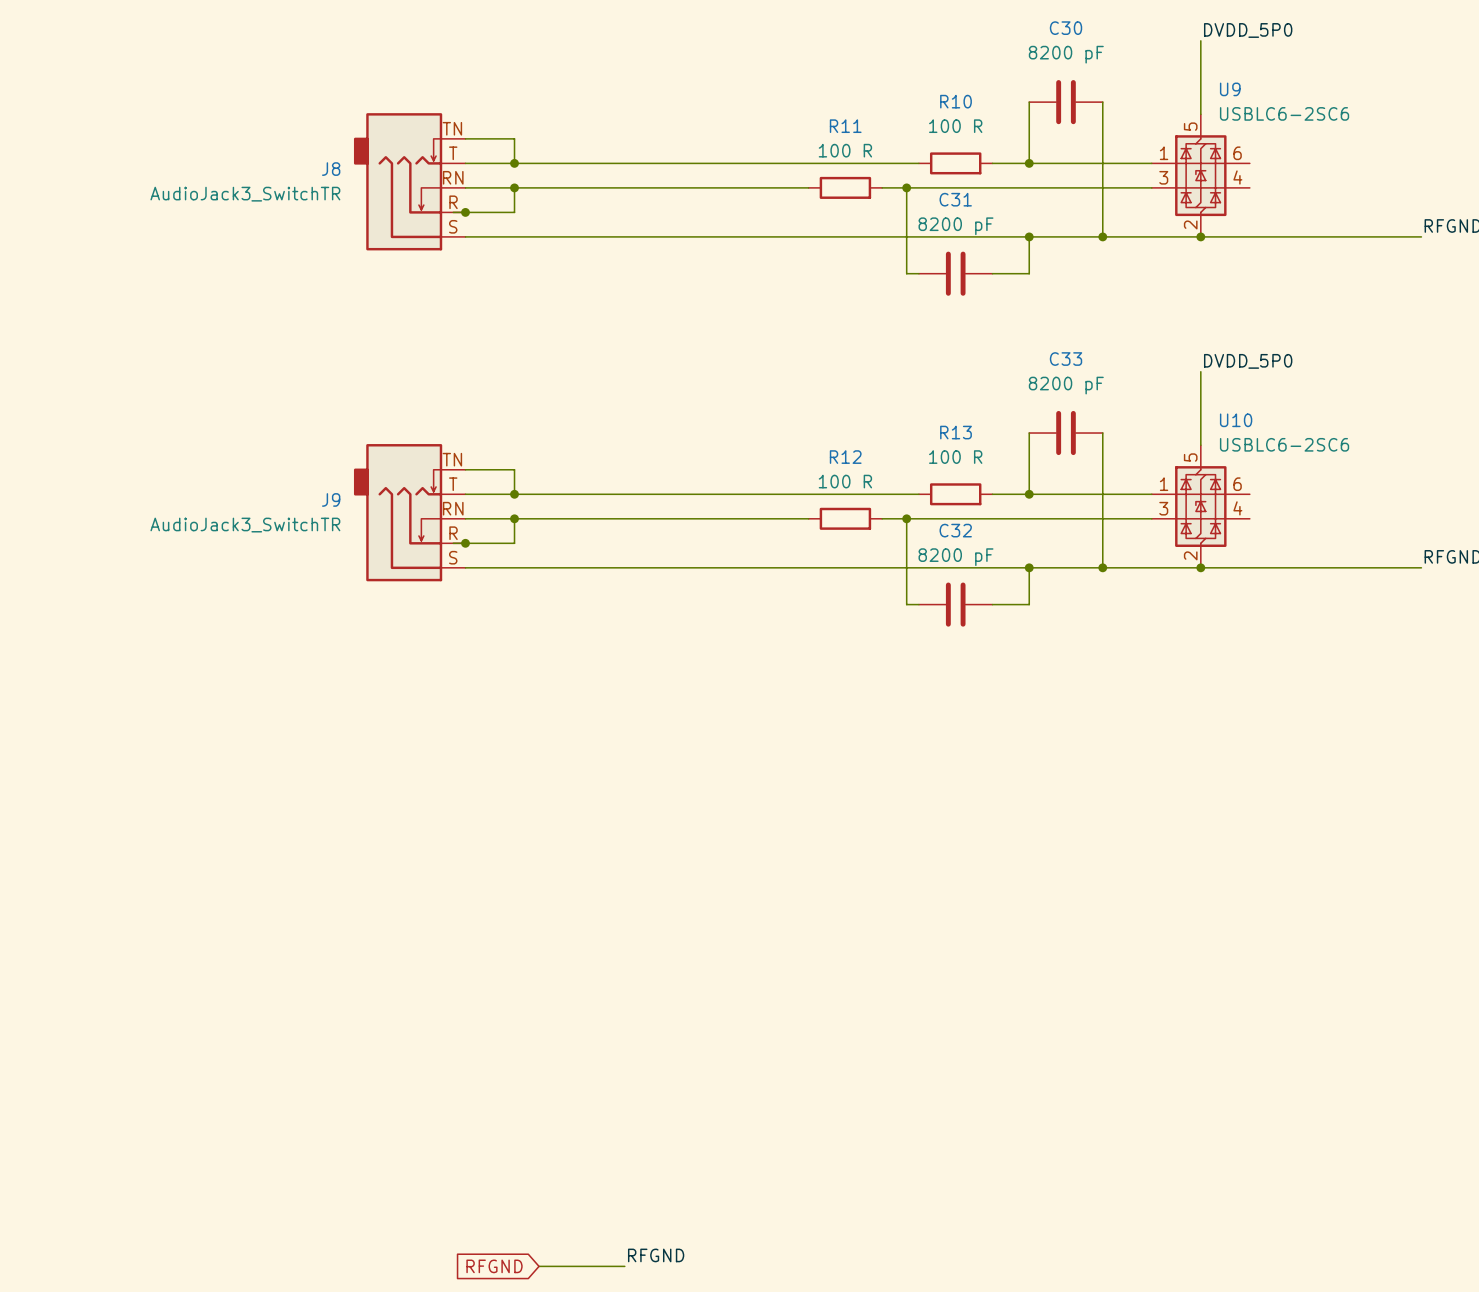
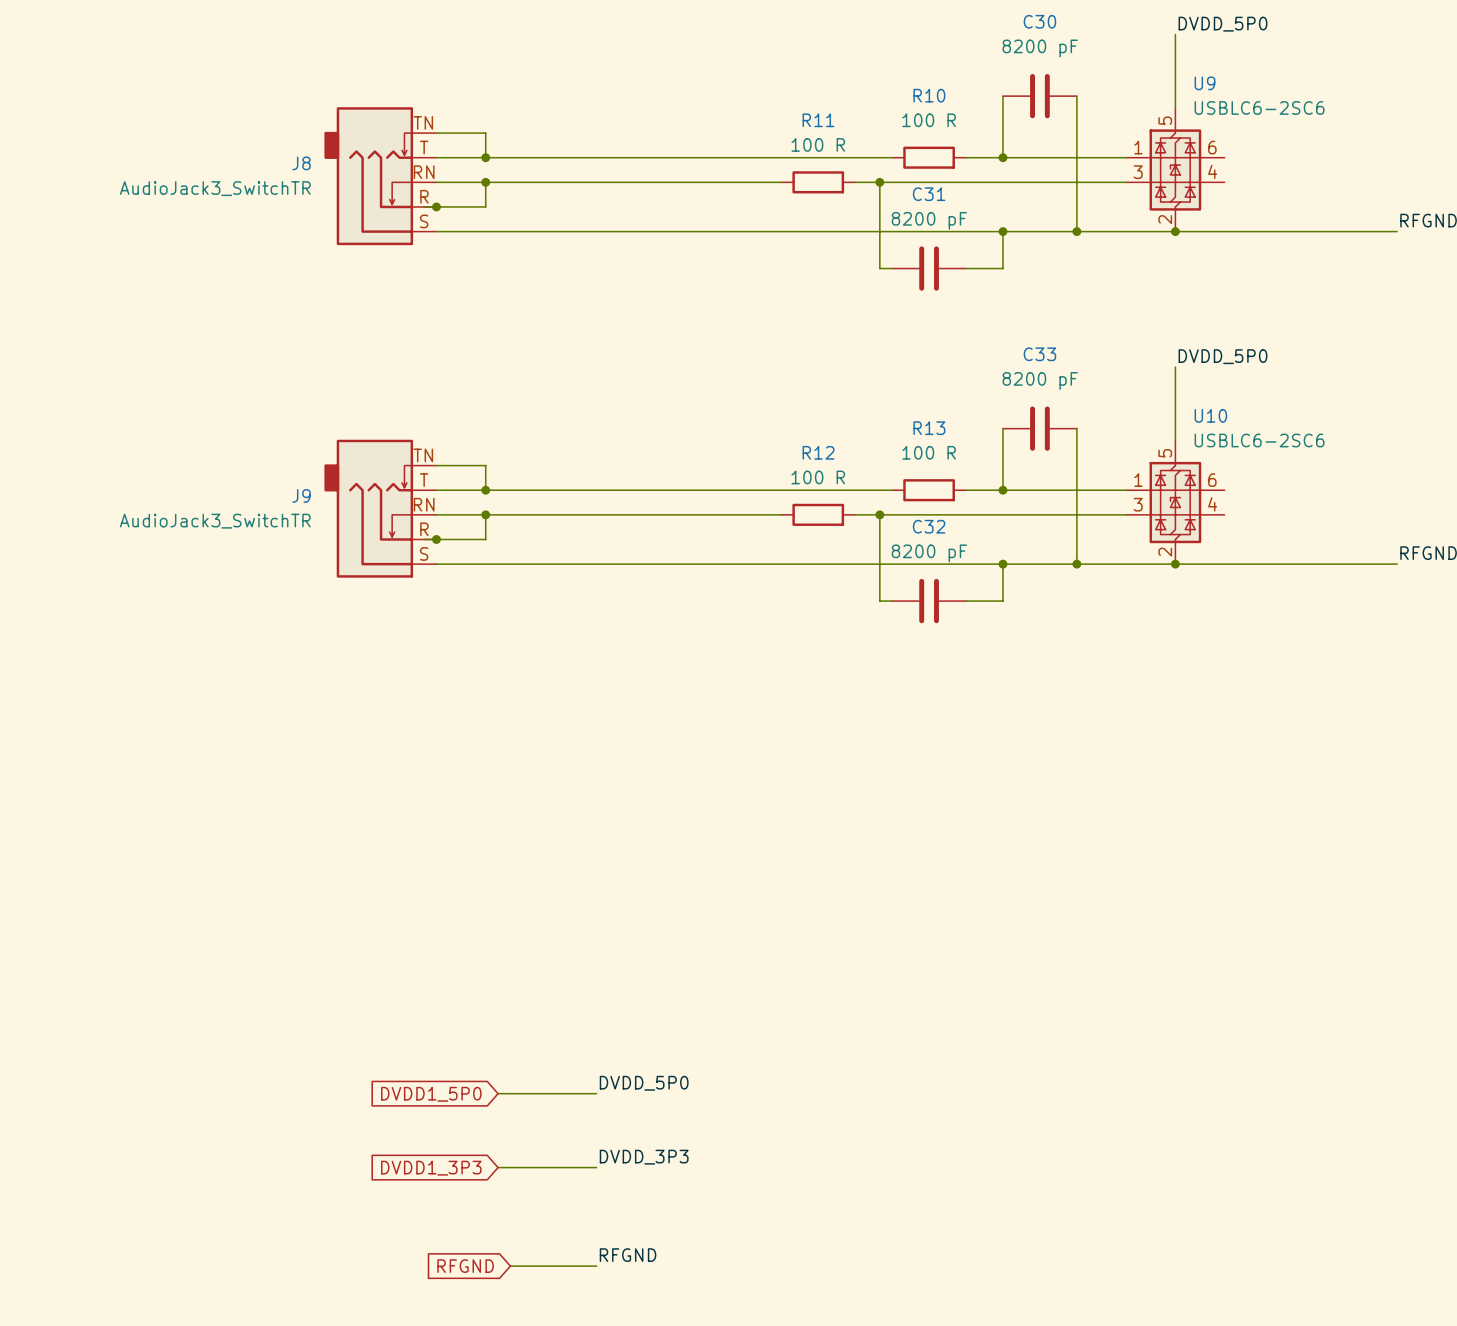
label: none -> DVDD_5P0 (644, 1083)
wire: none -> (498, 1093) (596, 1093)
global label: none -> DVDD1_5P0 (431, 1094)
label: none -> DVDD_3P3 (644, 1157)
global label: none -> DVDD1_3P3 (431, 1168)
wire: none -> (498, 1167) (596, 1167)

